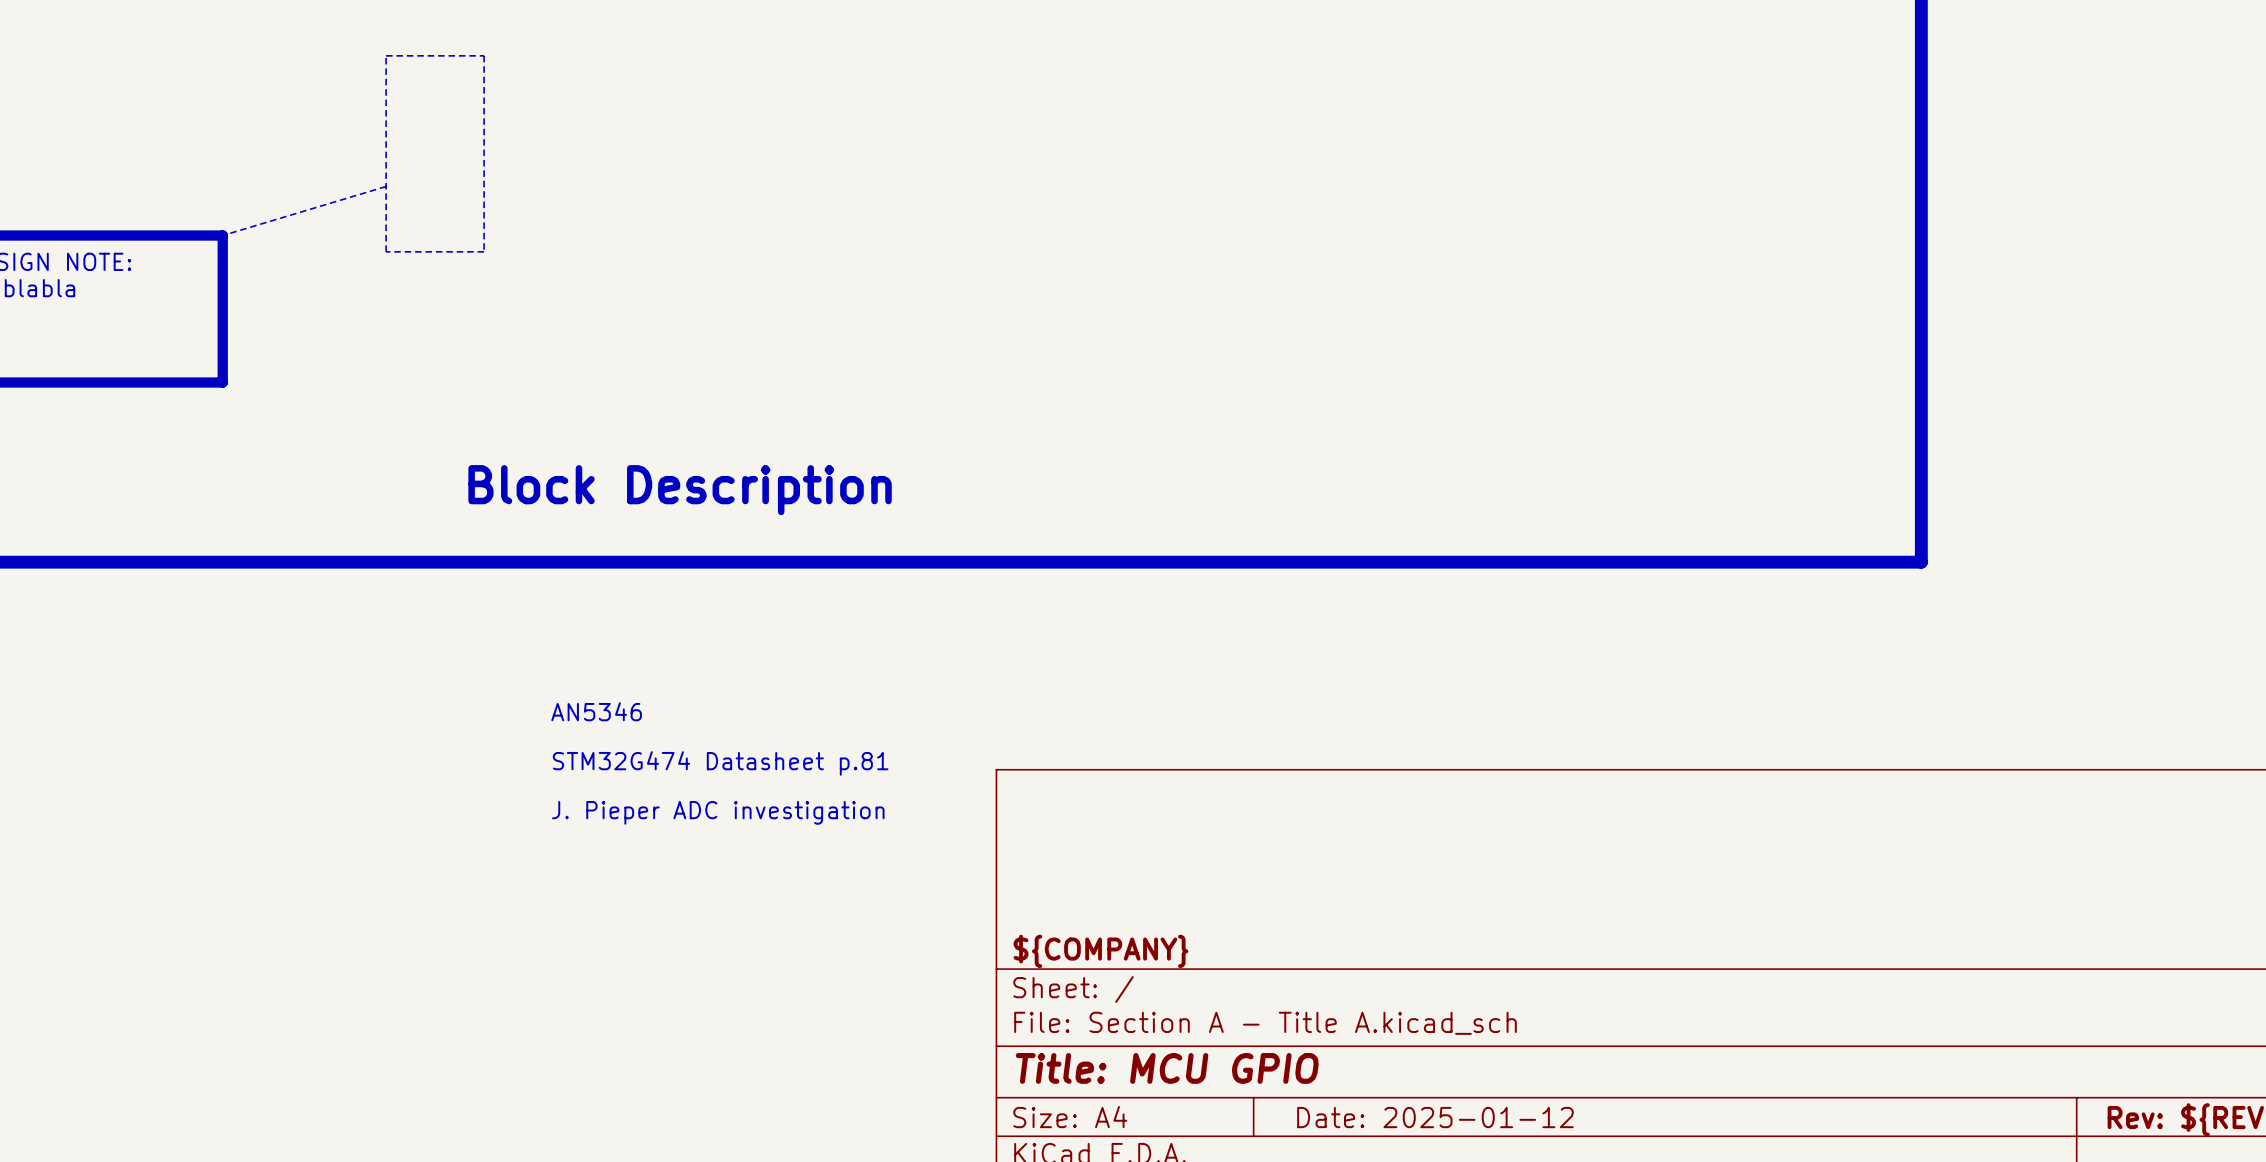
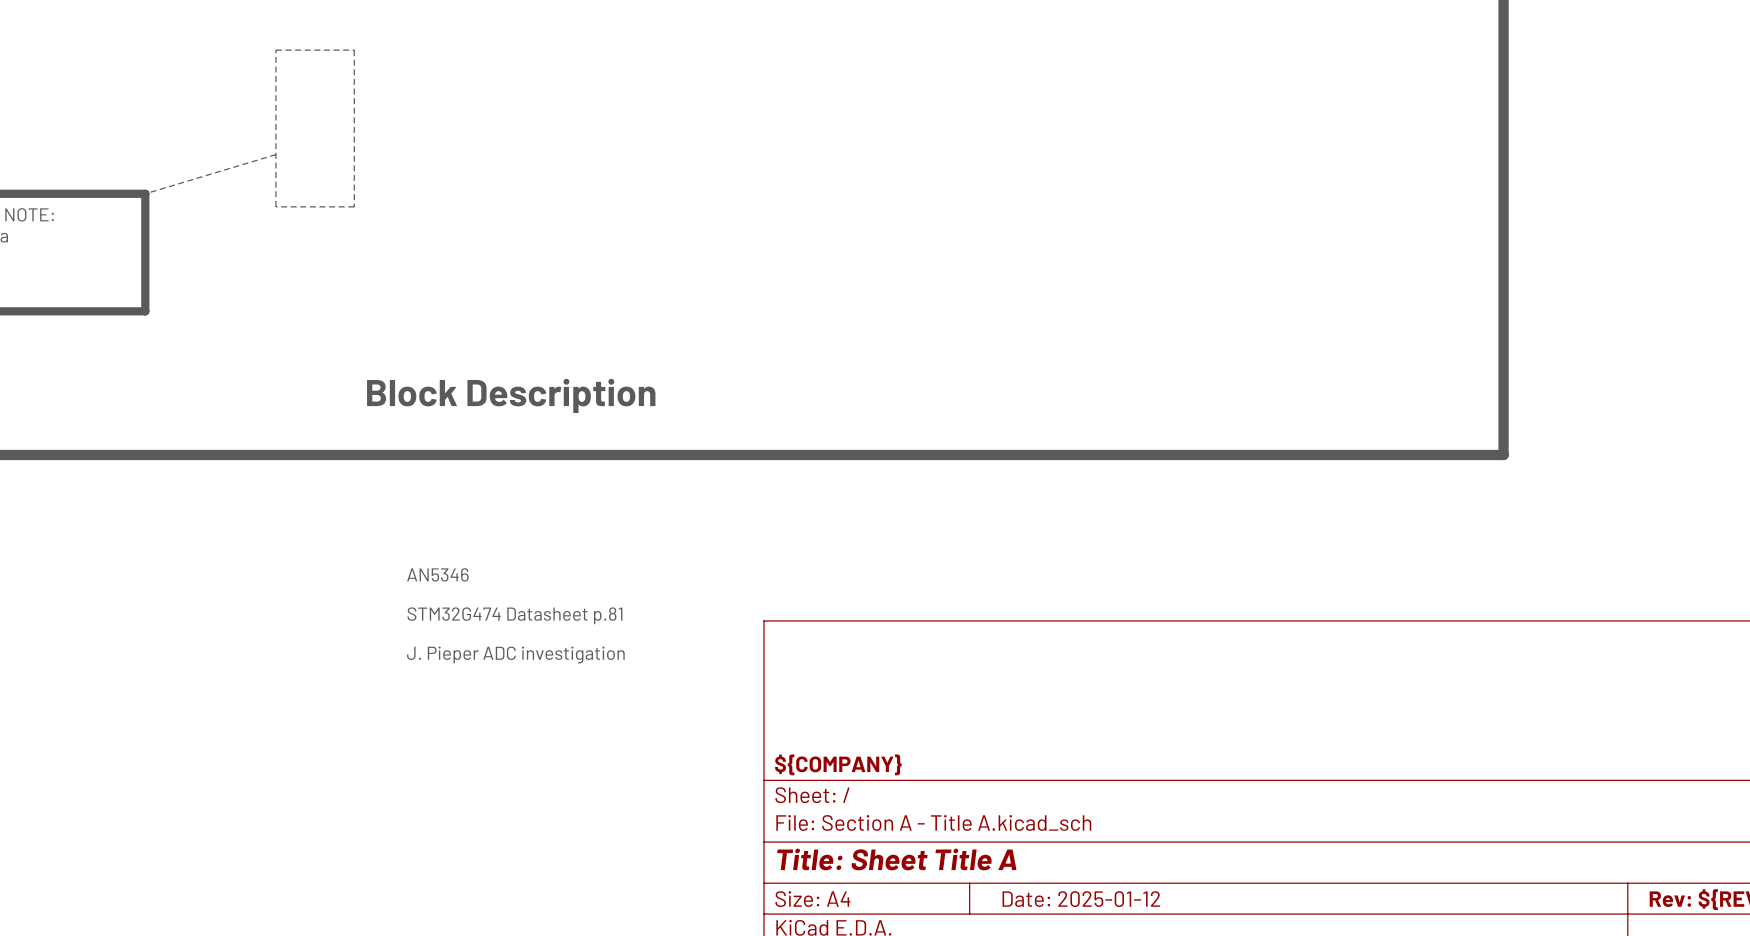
title block: Title: MCU GPIO (1167, 1068) -> Title: Sheet Title A (896, 859)

